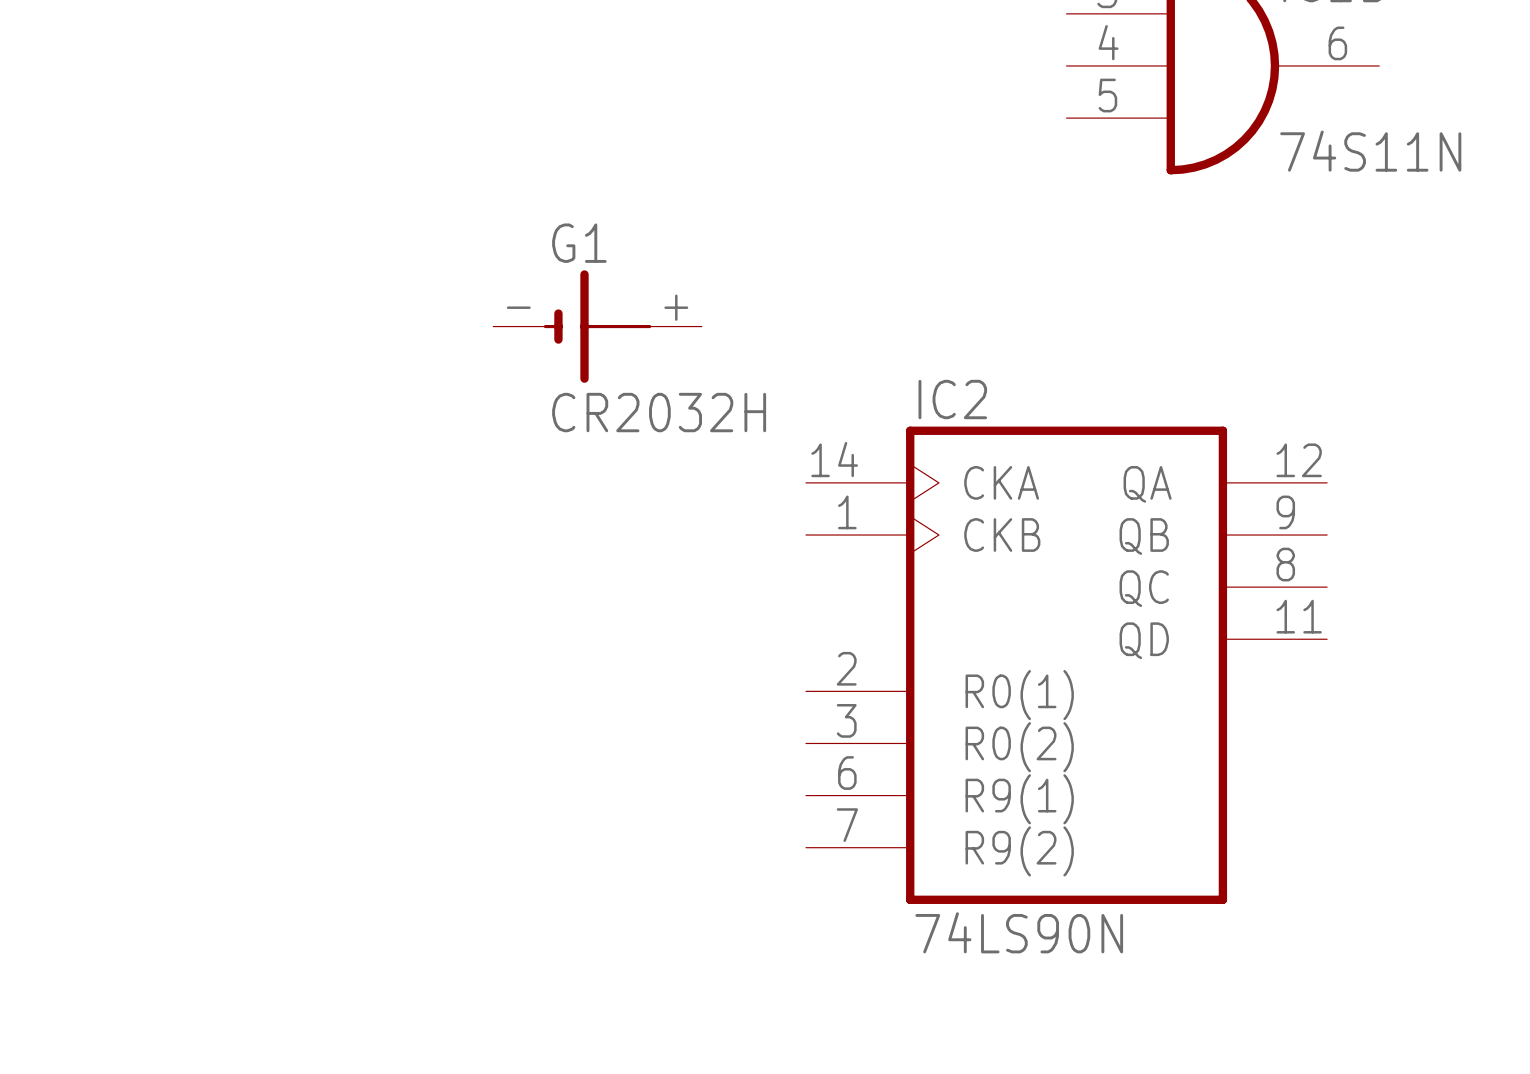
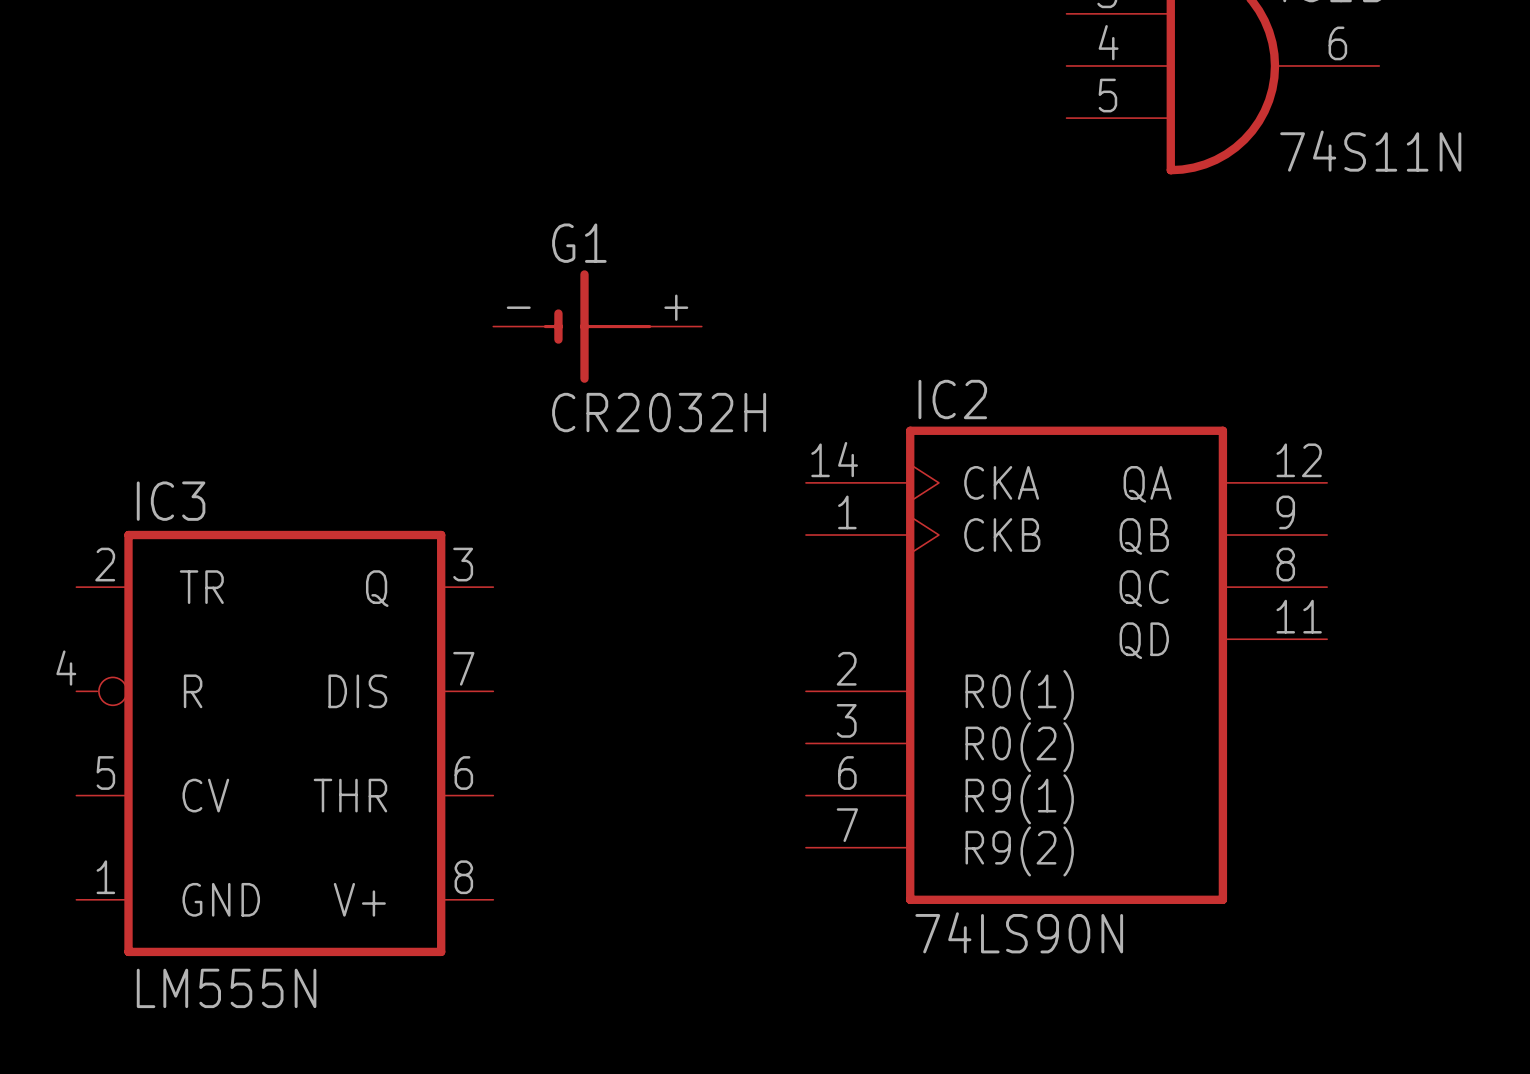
IC3: none -> LM555N (284, 743)

